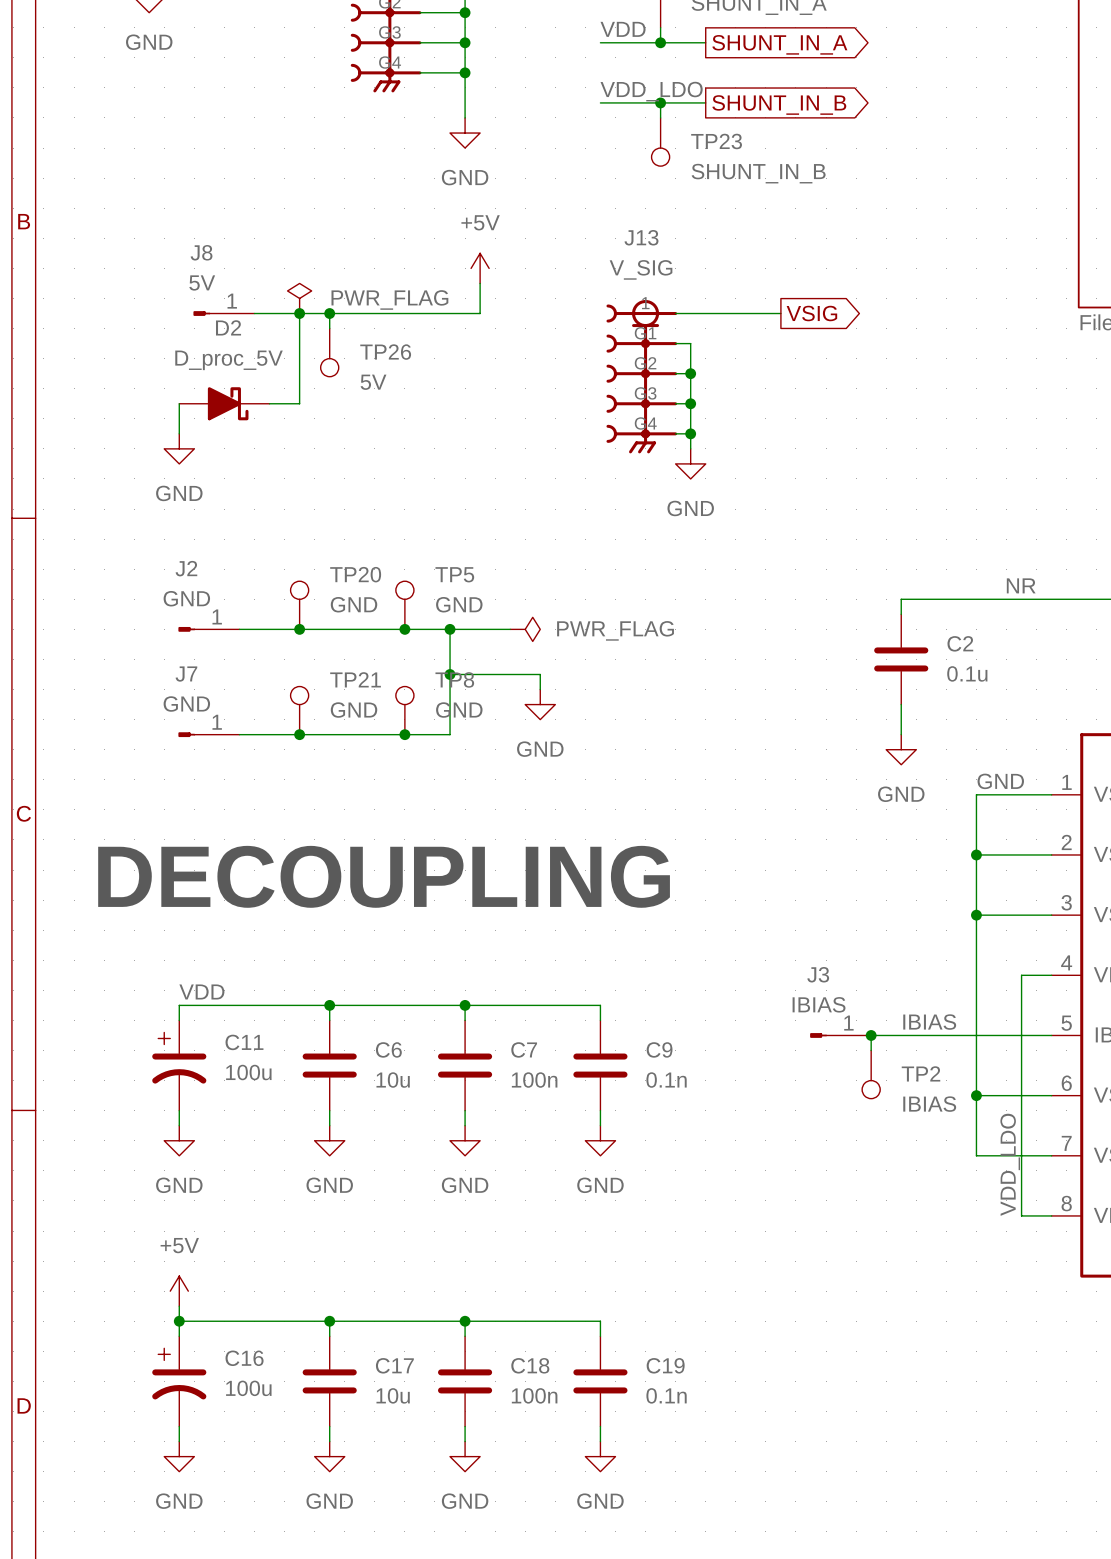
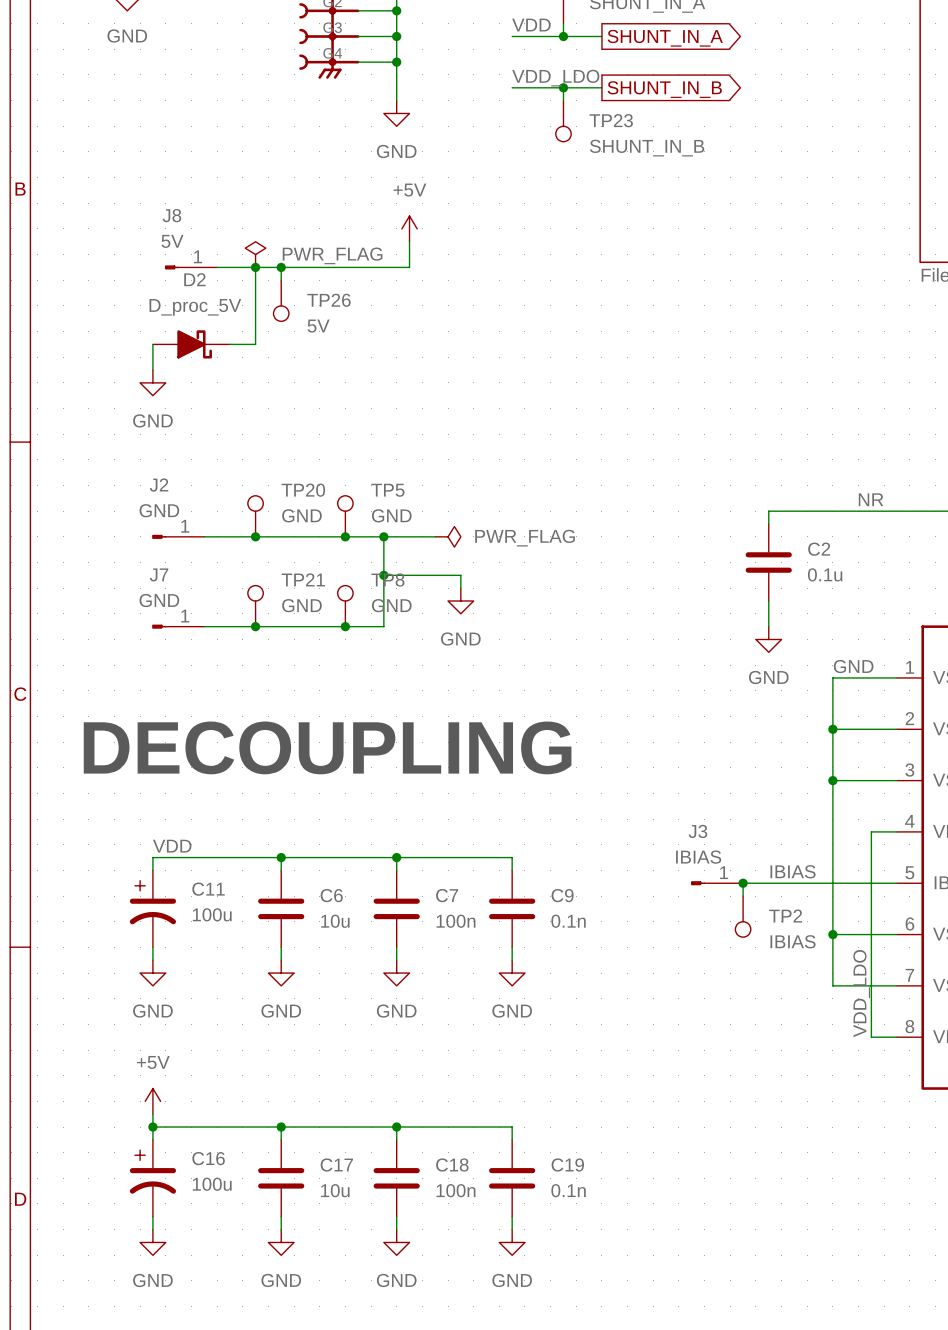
wire: (675, 313) (780, 313) -> none
global label: VSIG (811, 313) -> none
wire: (675, 343) (690, 343) (690, 448) -> none
wire: (675, 373) (690, 373) -> none
junction: (690, 373) -> none
J13: V_SIG (641, 376) -> none
wire: (675, 403) (690, 403) -> none
junction: (690, 403) -> none
wire: (675, 433) (690, 433) -> none
junction: (690, 433) -> none
power symbol: GND (690, 463) -> none

